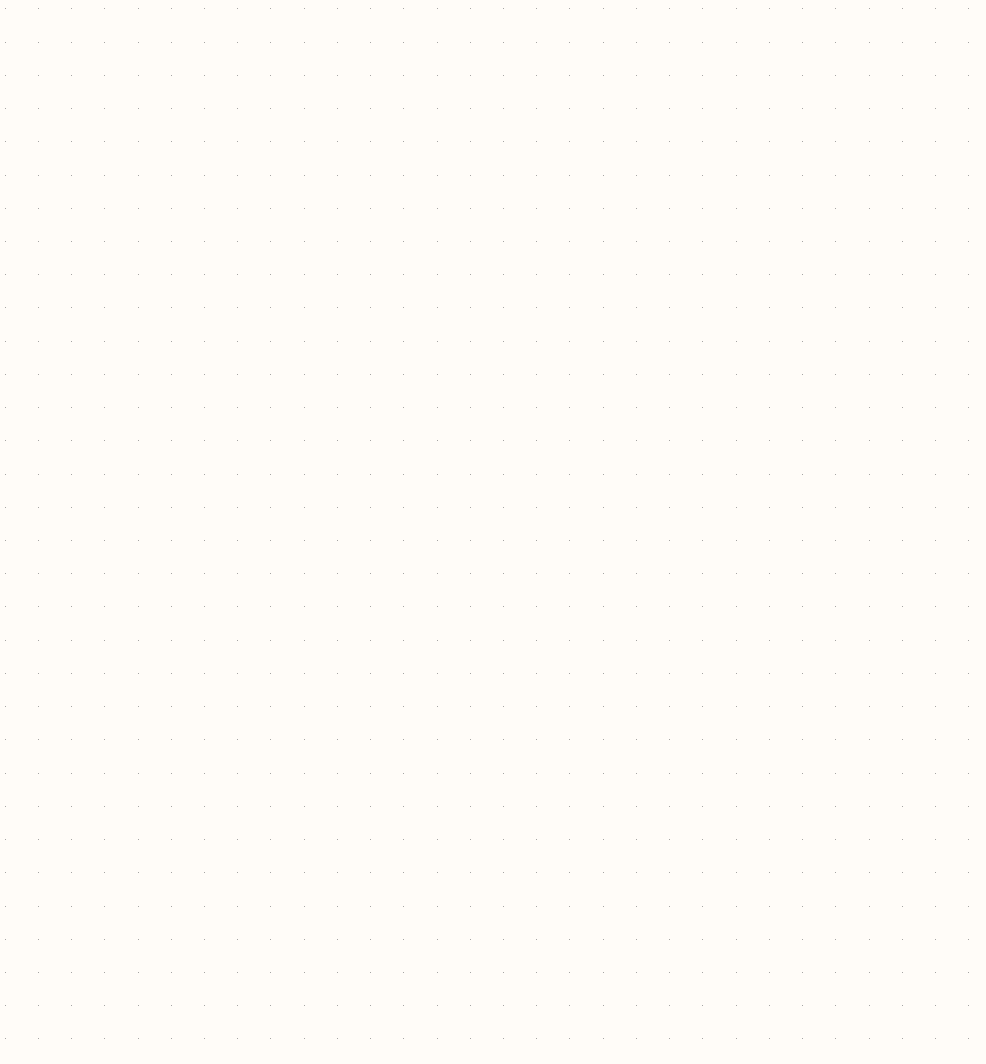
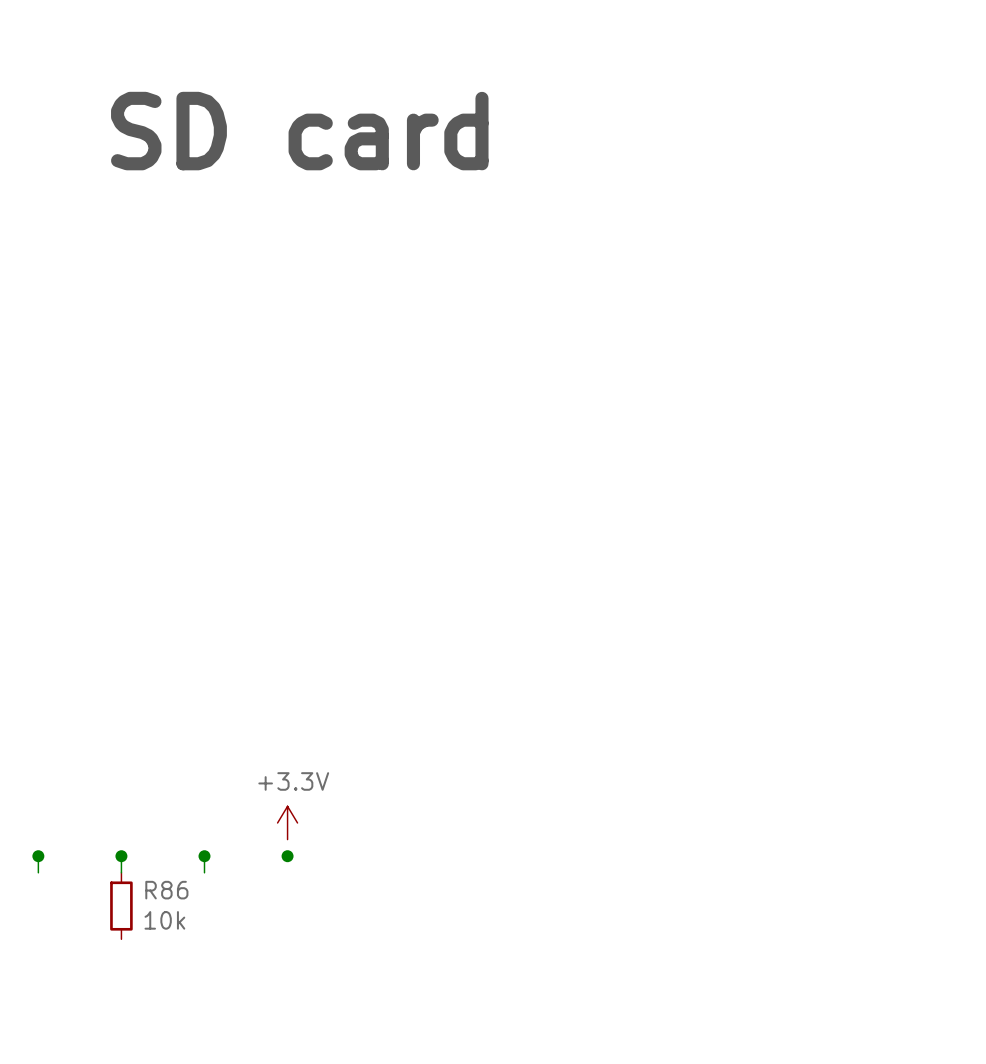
text: none -> SD card (299, 131)
power symbol: none -> +3.3V (287, 822)
wire: none -> (38, 856) (38, 872)
junction: none -> (38, 856)
wire: none -> (121, 856) (121, 872)
junction: none -> (121, 856)
wire: none -> (204, 856) (204, 872)
junction: none -> (204, 856)
junction: none -> (287, 856)
R86: none -> 10k (121, 906)

